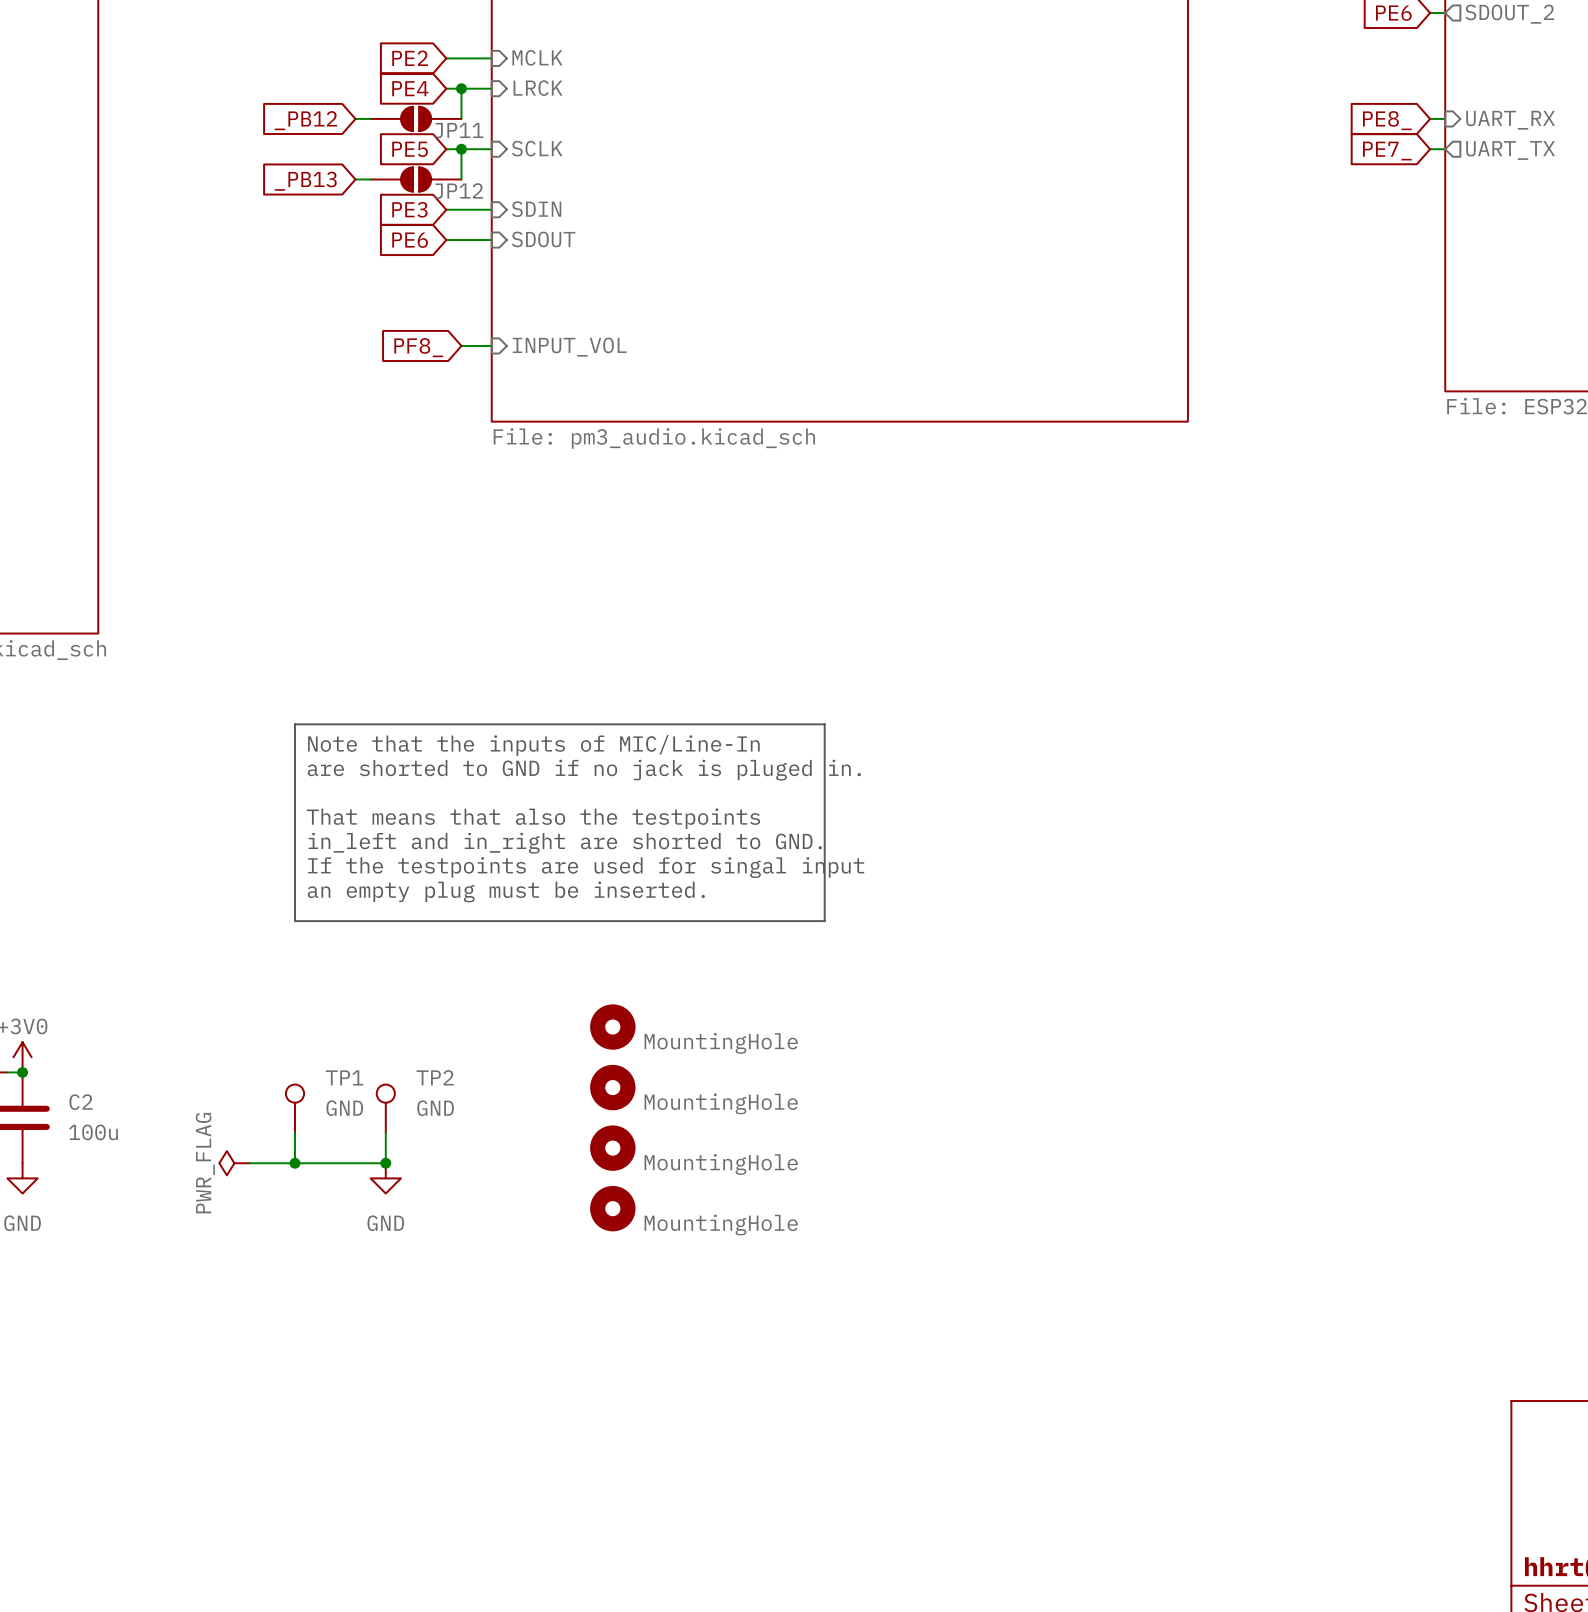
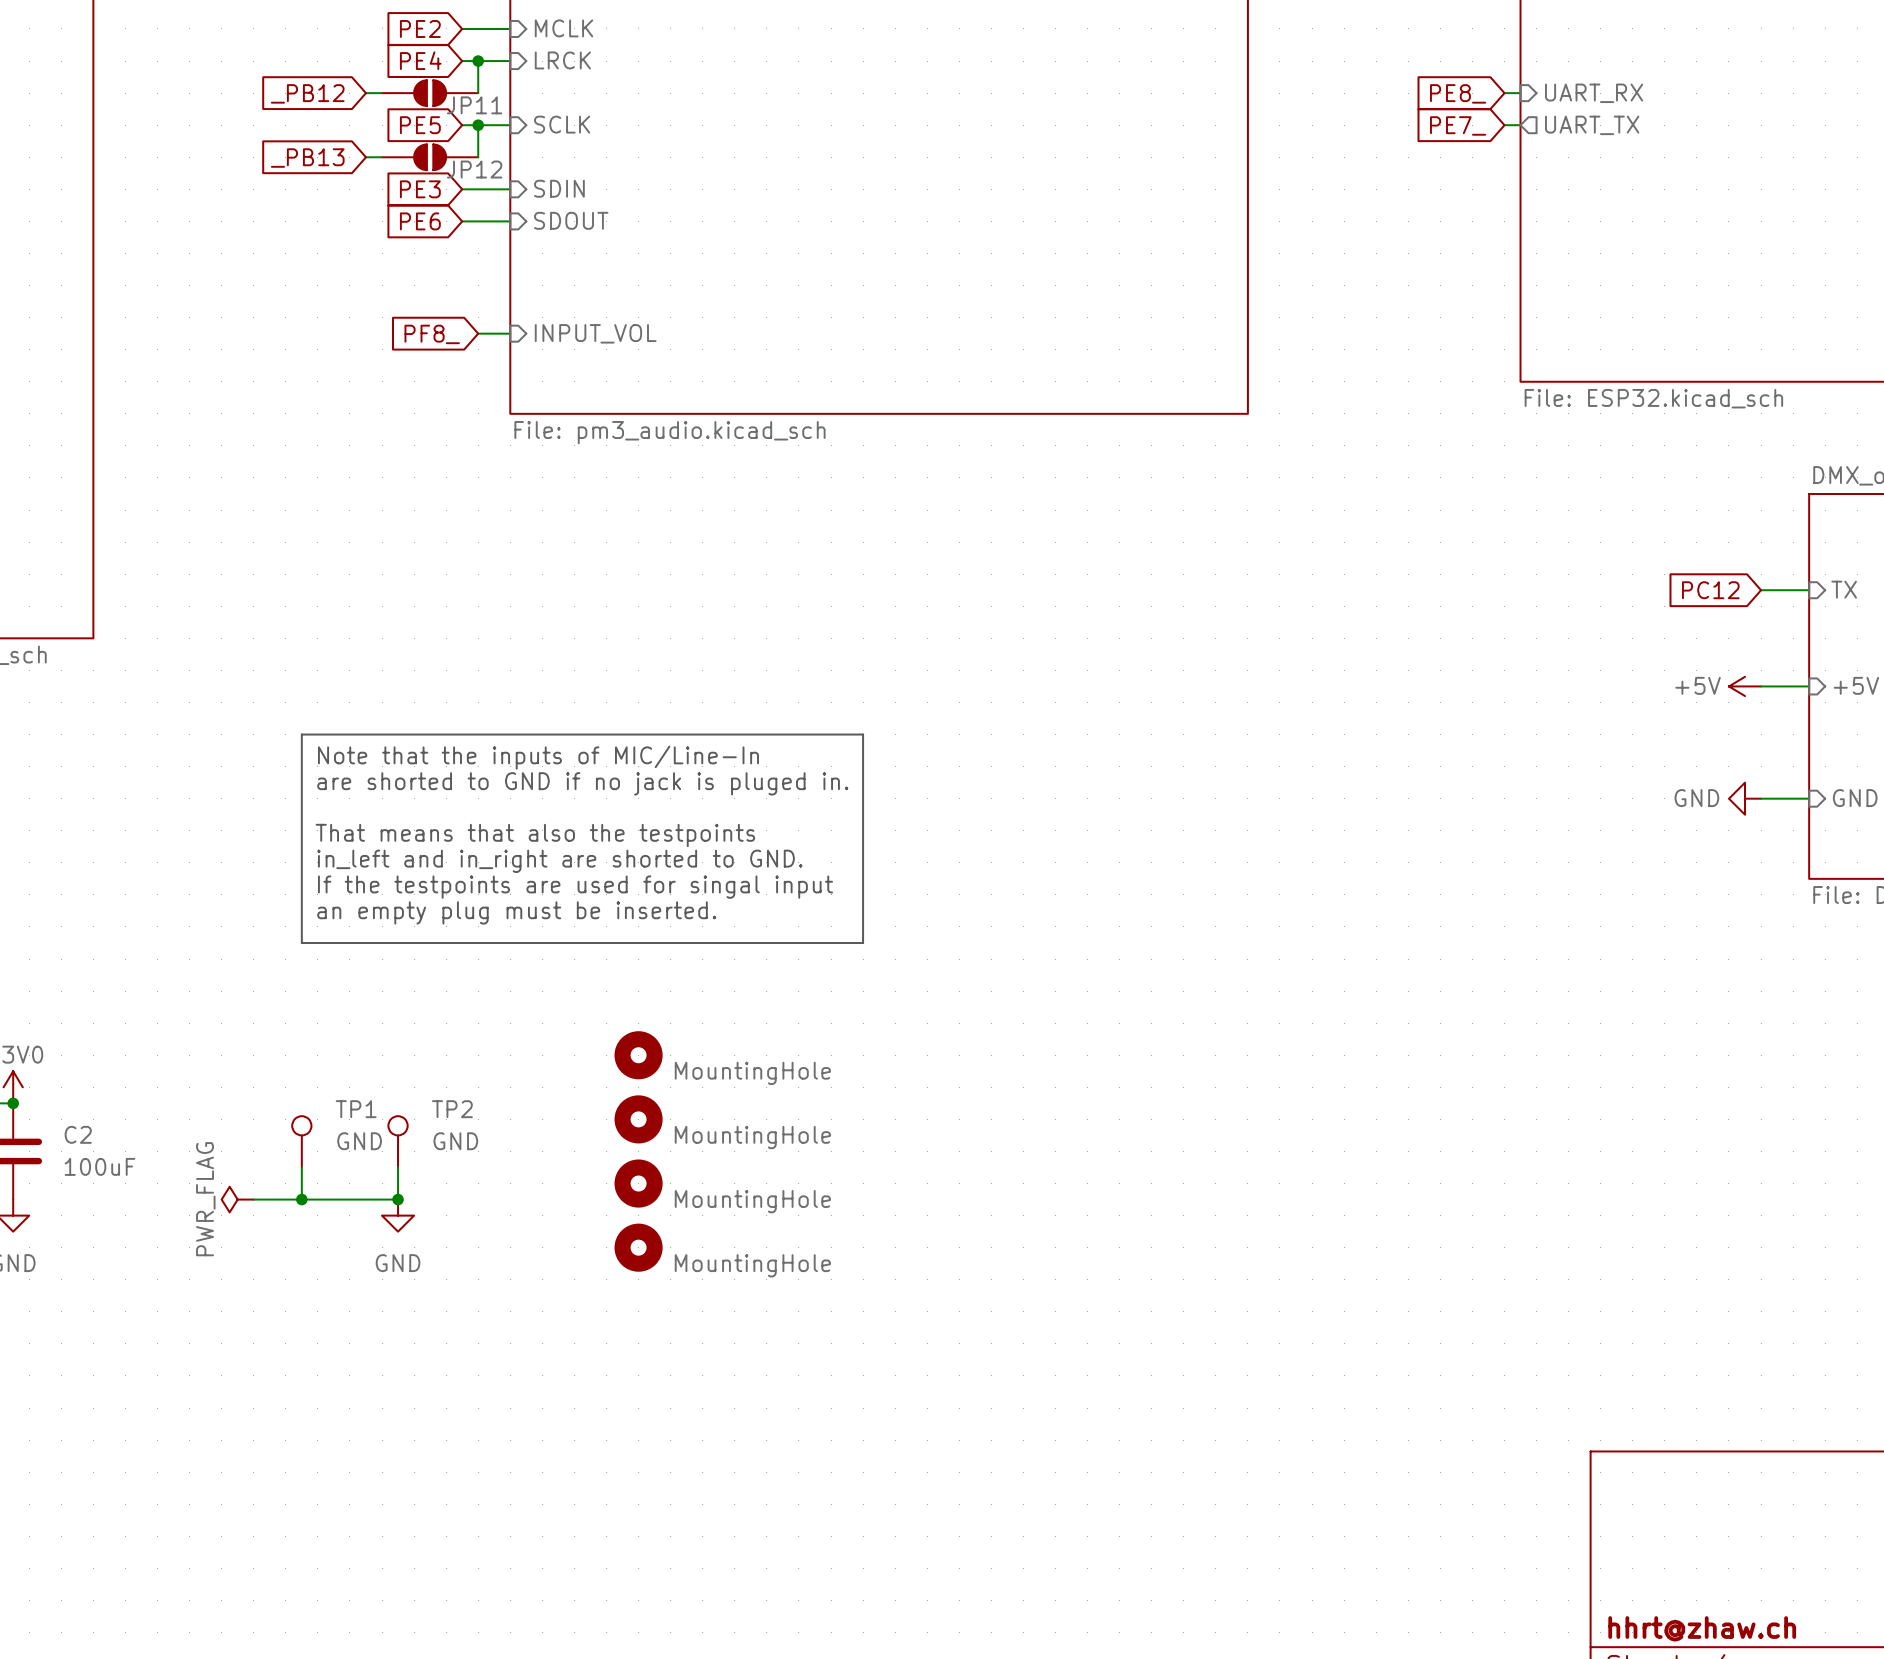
C2 value: 100u (93, 1132) -> 100uF (99, 1166)

